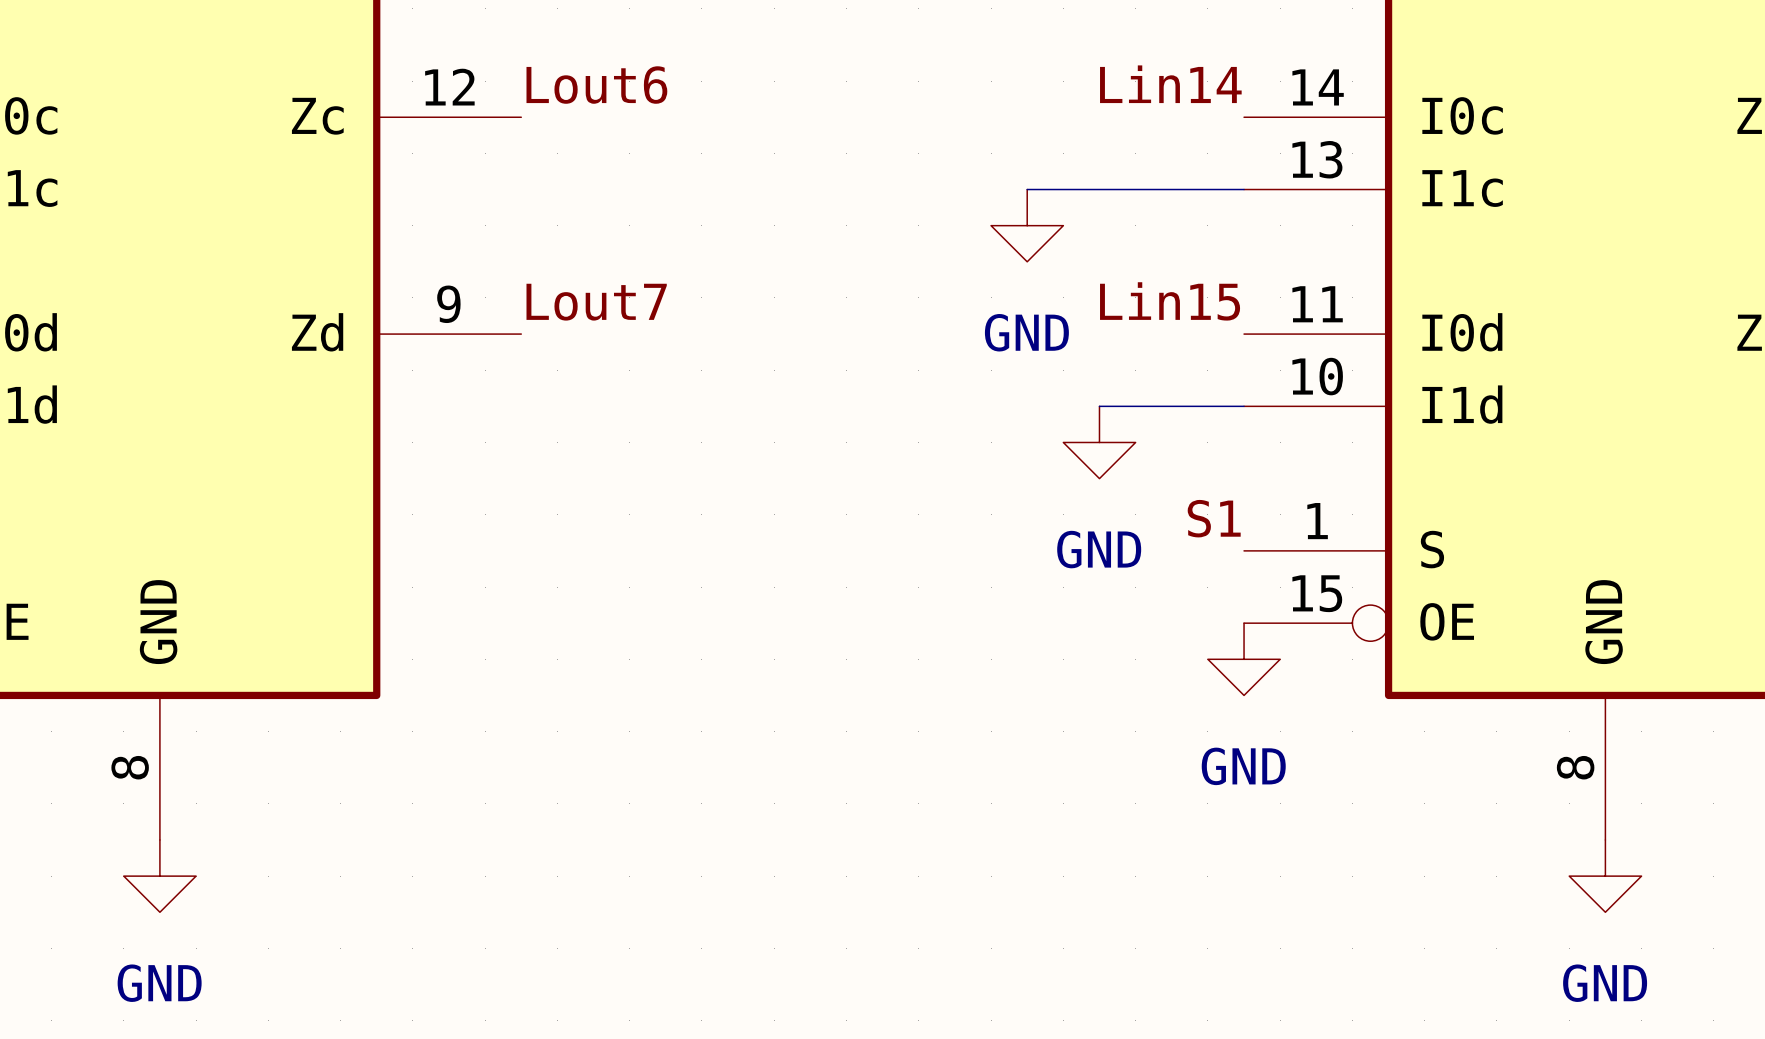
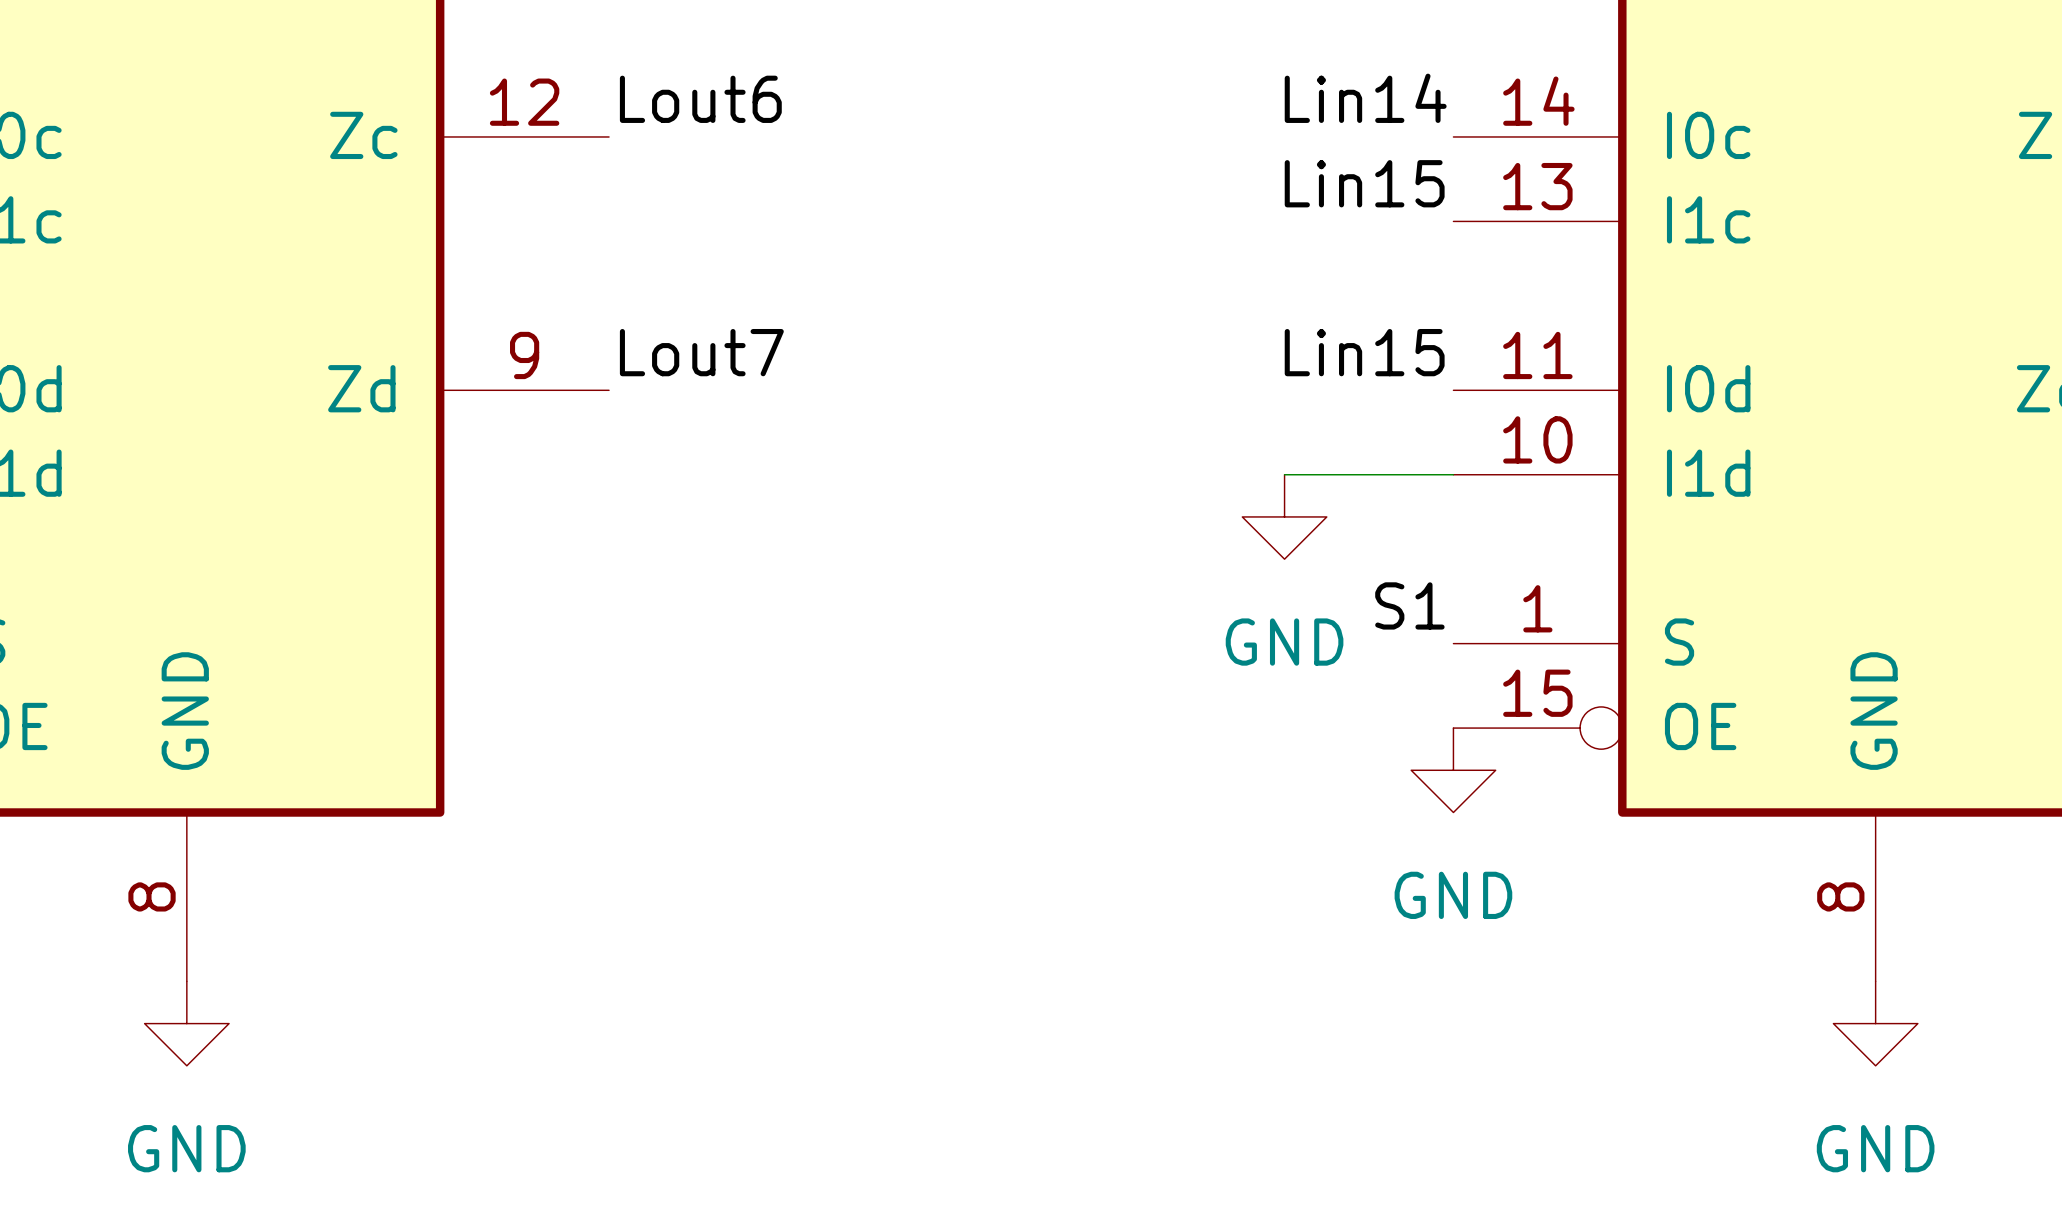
label: none -> Lin15 (1364, 183)
wire: (1027, 189) (1244, 189) -> none
power symbol: GND (1027, 225) -> none

